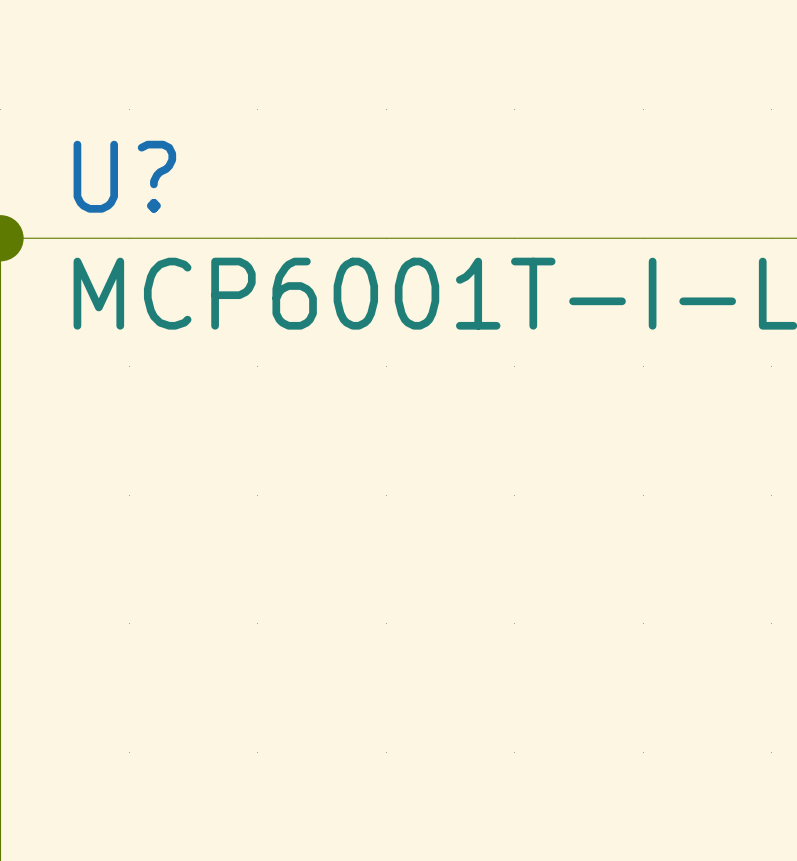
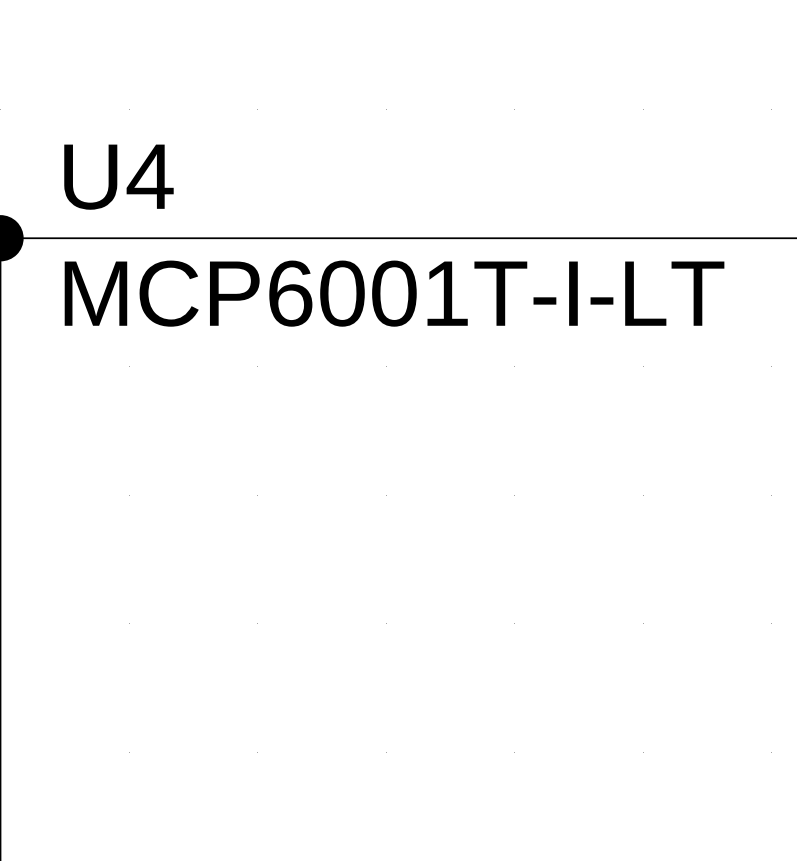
U? name: U? (124, 176) -> U4 (118, 177)

